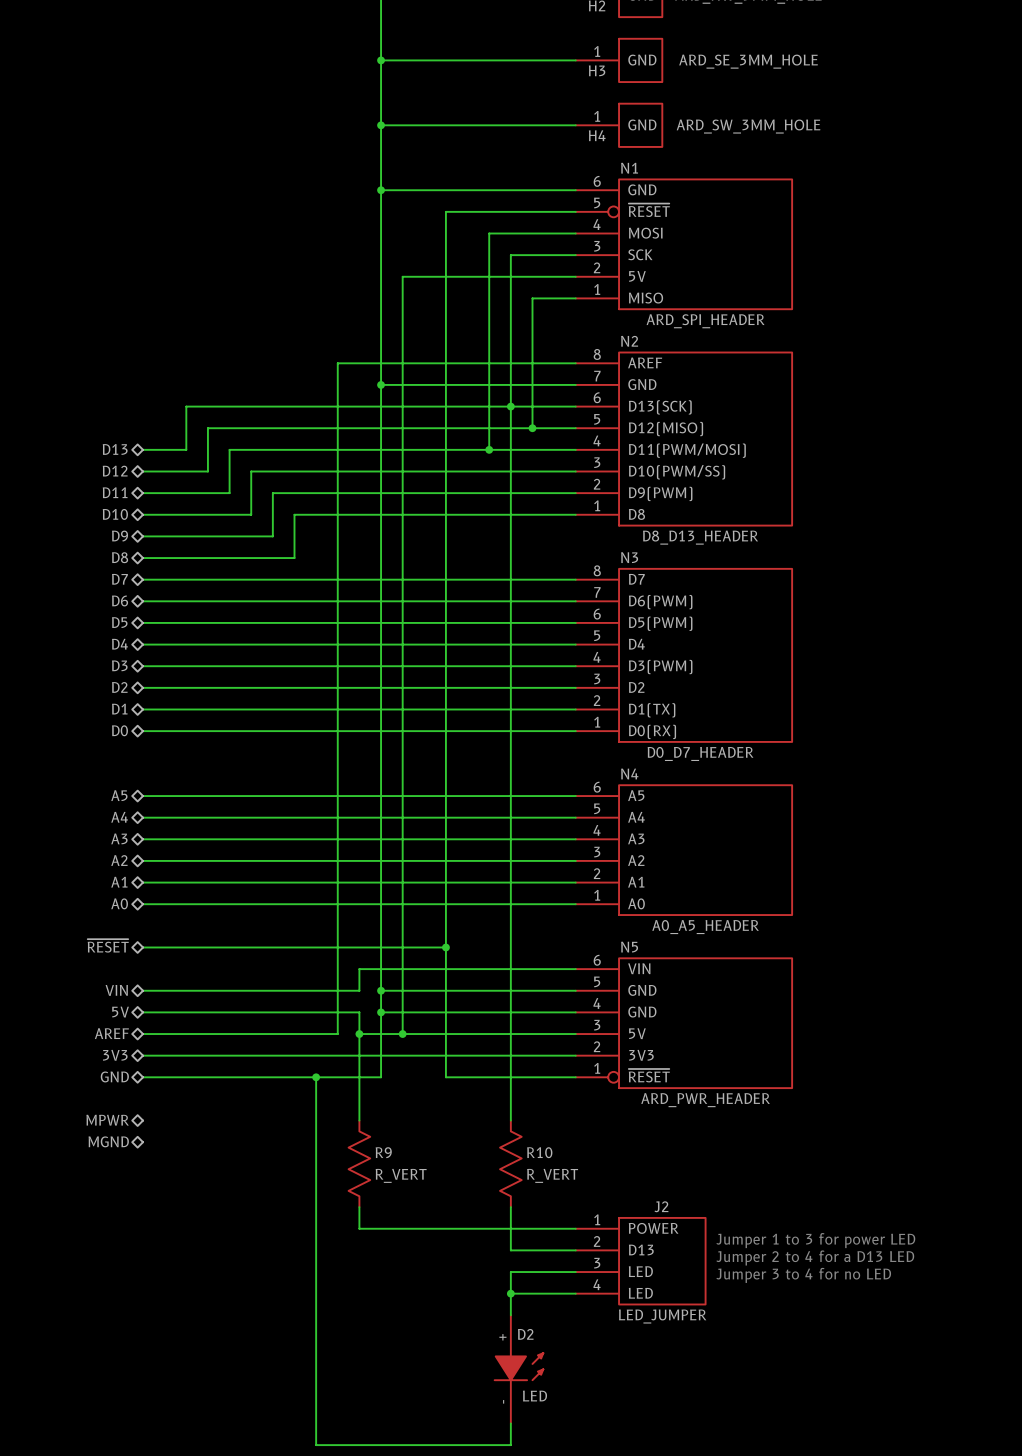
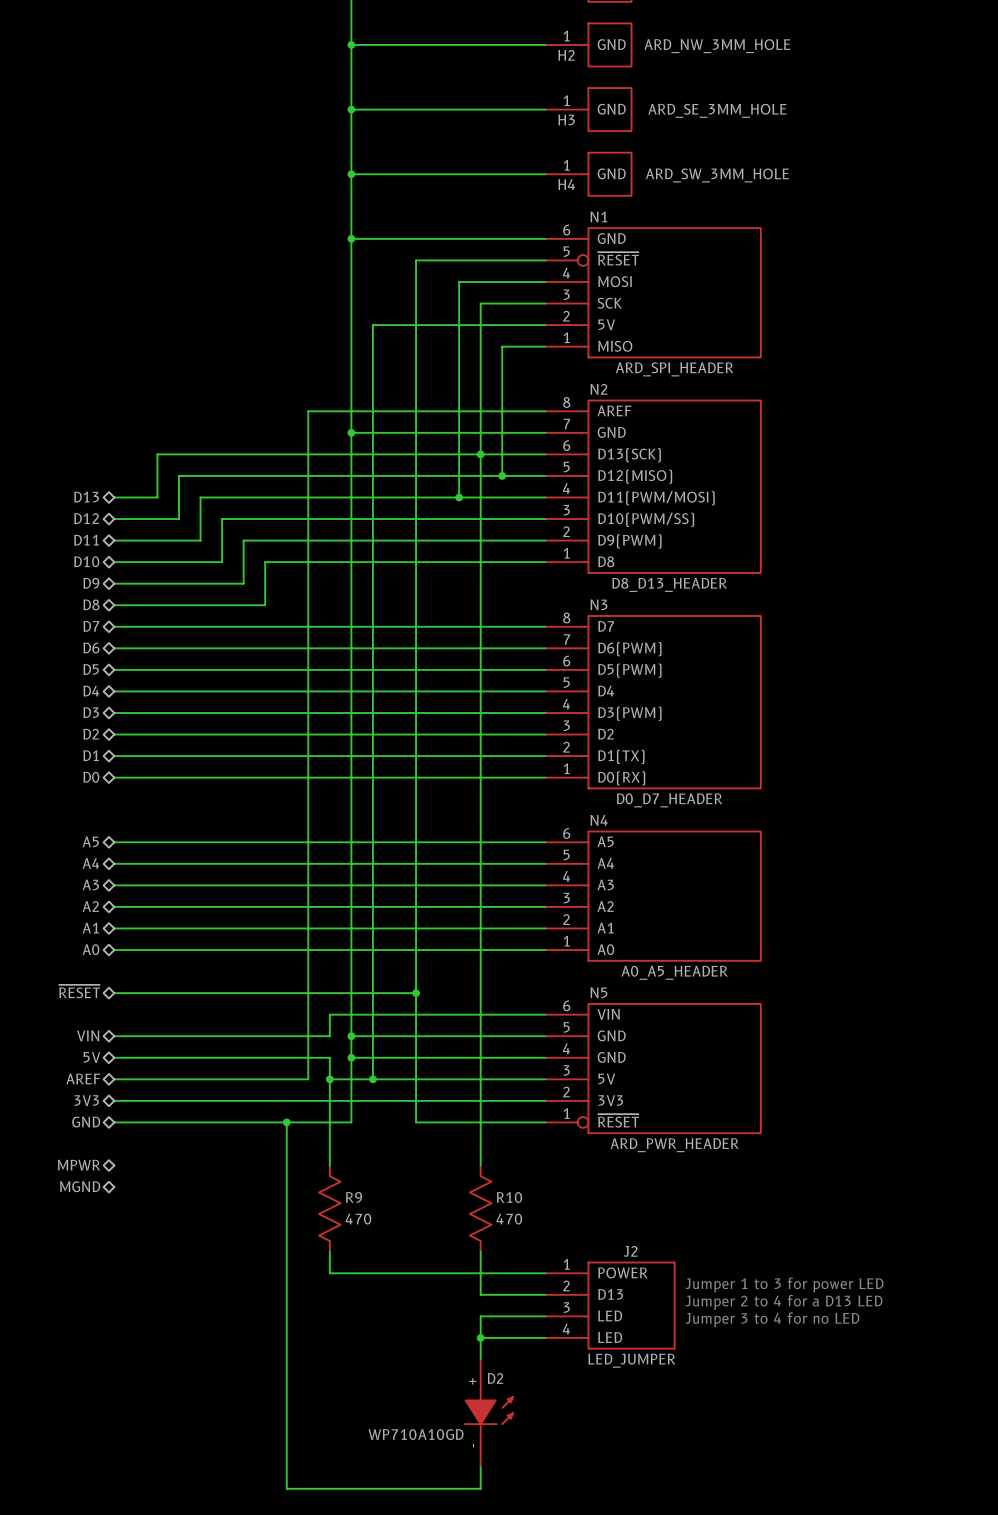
R9 value: R_VERT (401, 1175) -> 470 (358, 1219)
R10 value: R_VERT (552, 1175) -> 470 (509, 1219)
D2 value: LED (535, 1396) -> WP710A10GD (416, 1434)

